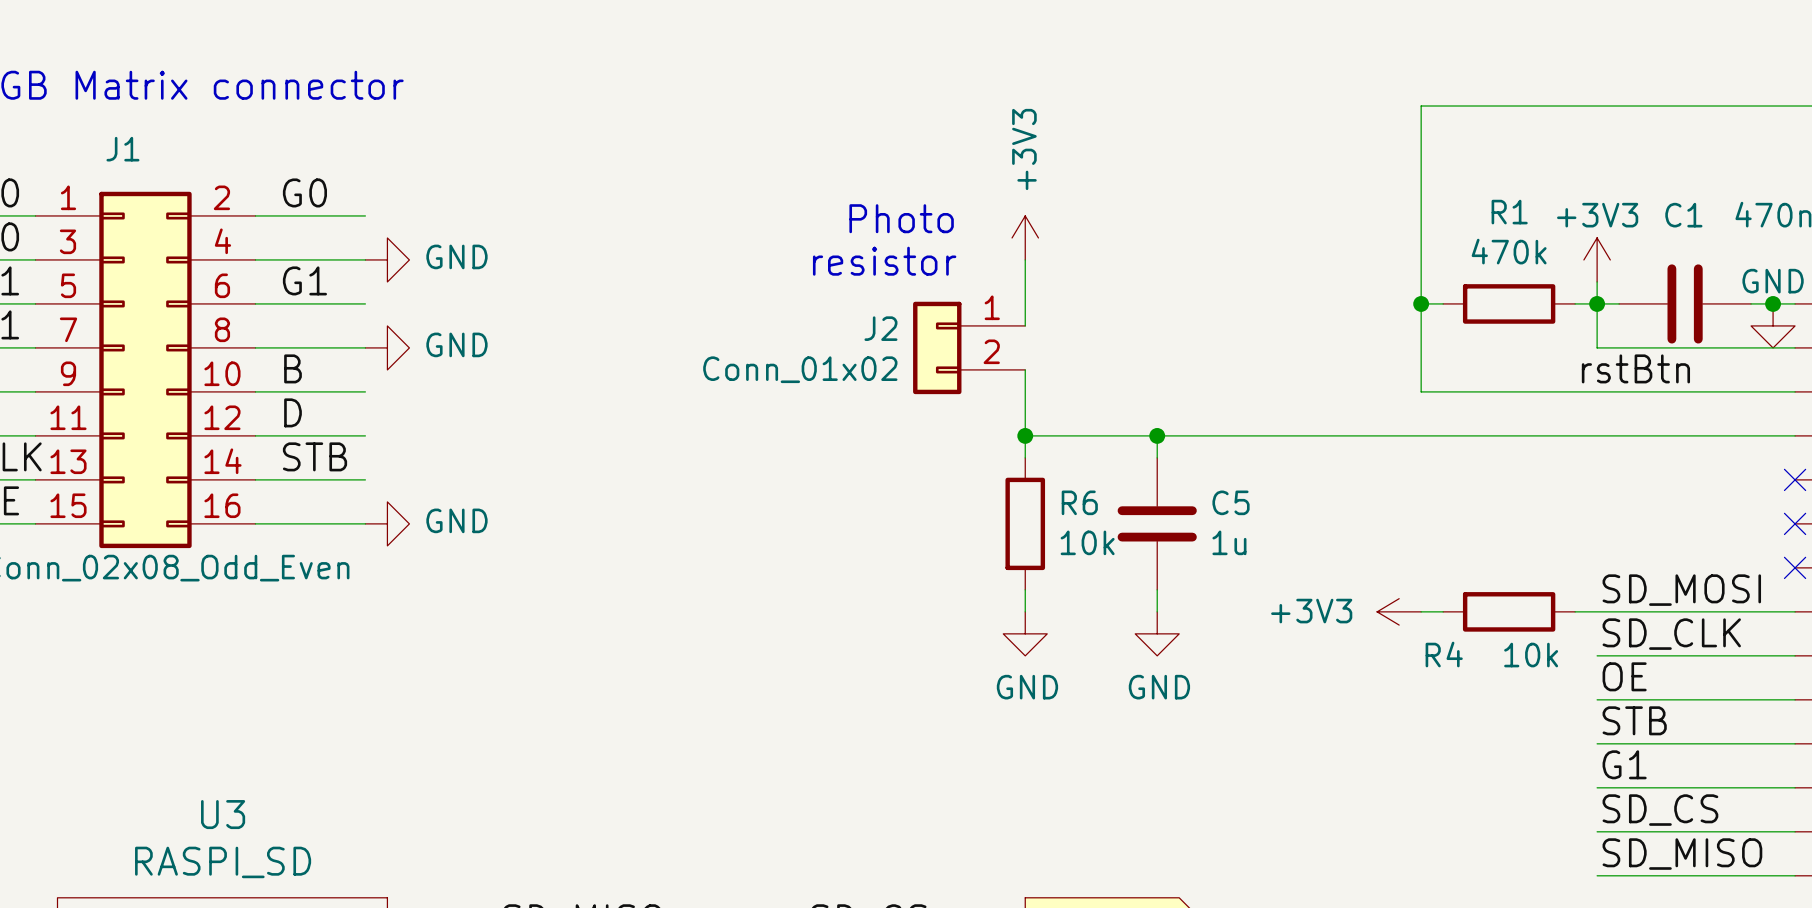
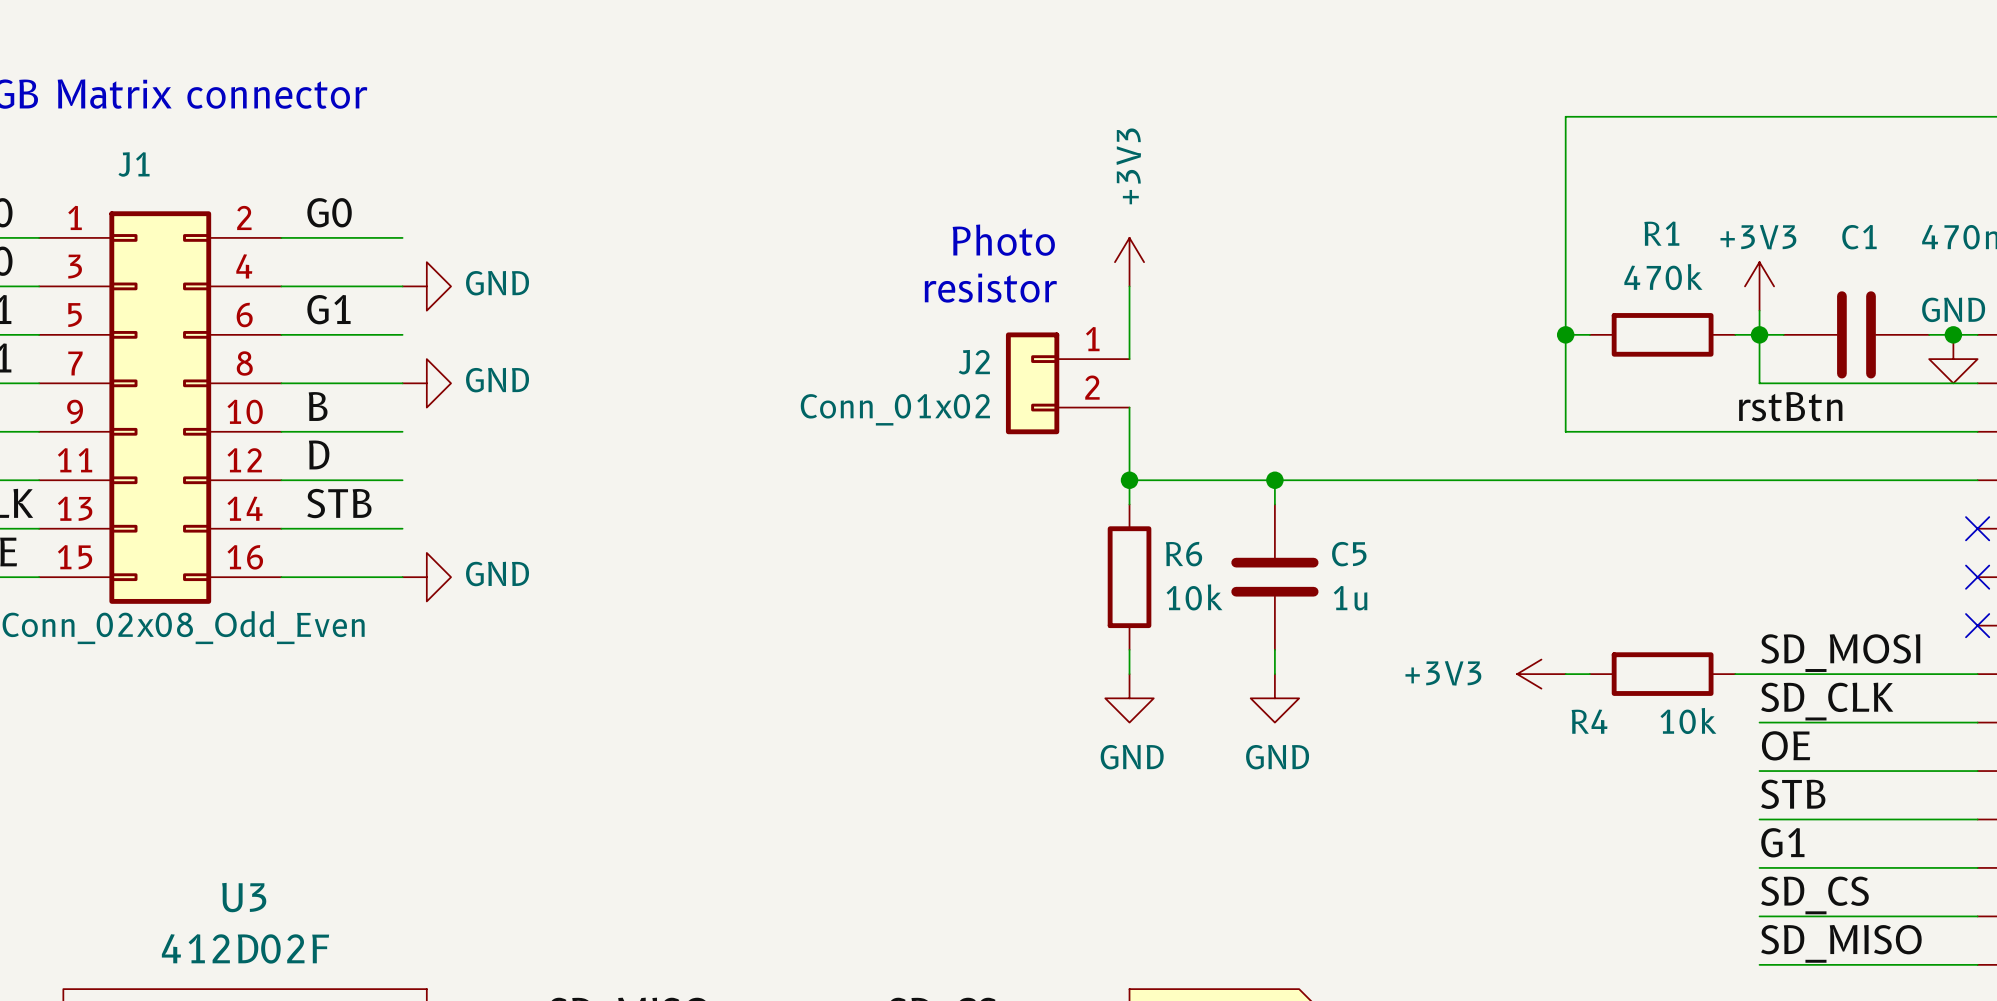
U3 value: RASPI_SD (223, 862) -> 412D02F (245, 948)

